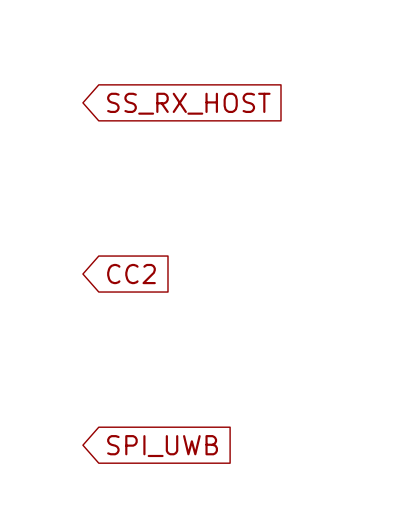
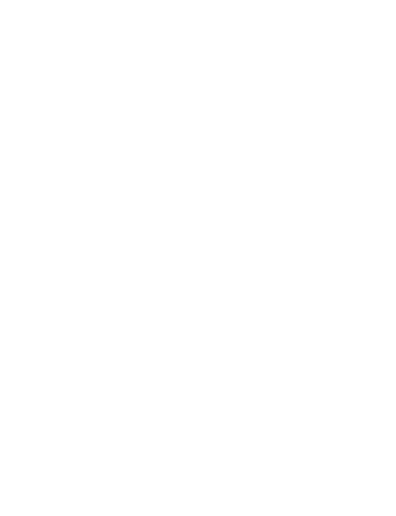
global label: SS_RX_HOST (188, 103) -> none
global label: CC2 (131, 274) -> none
global label: SPI_UWB (162, 446) -> none

